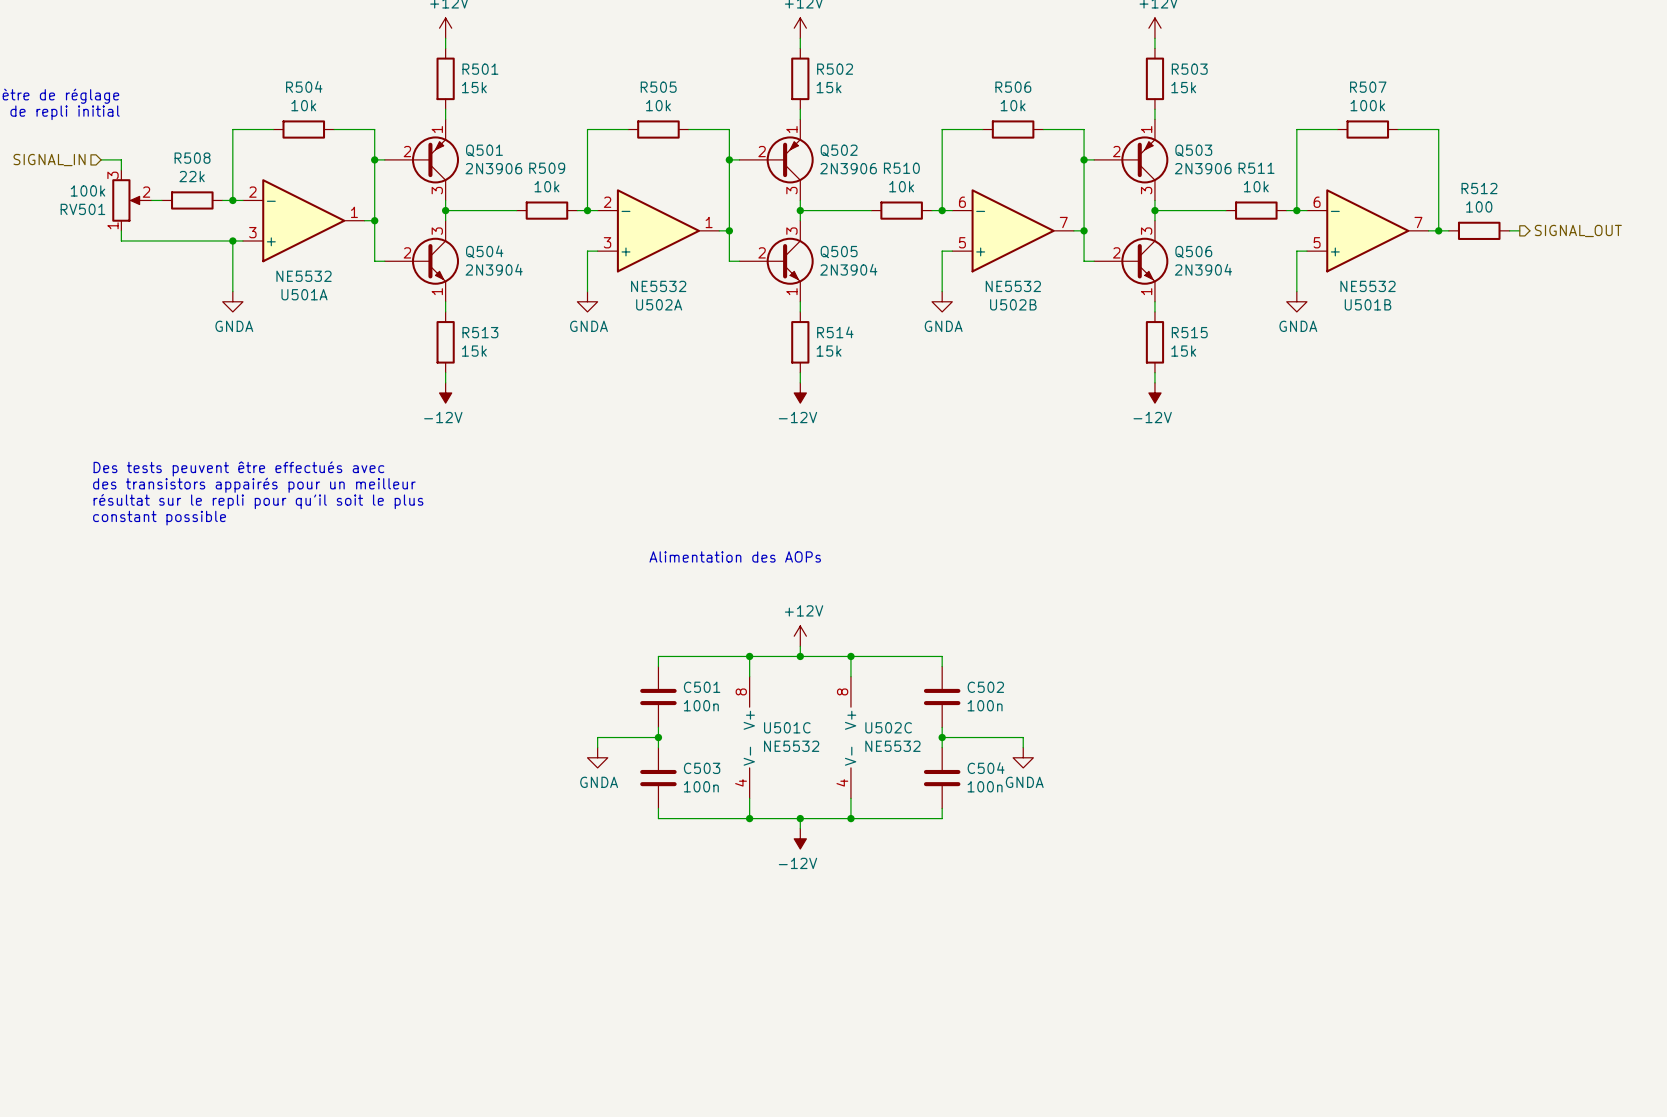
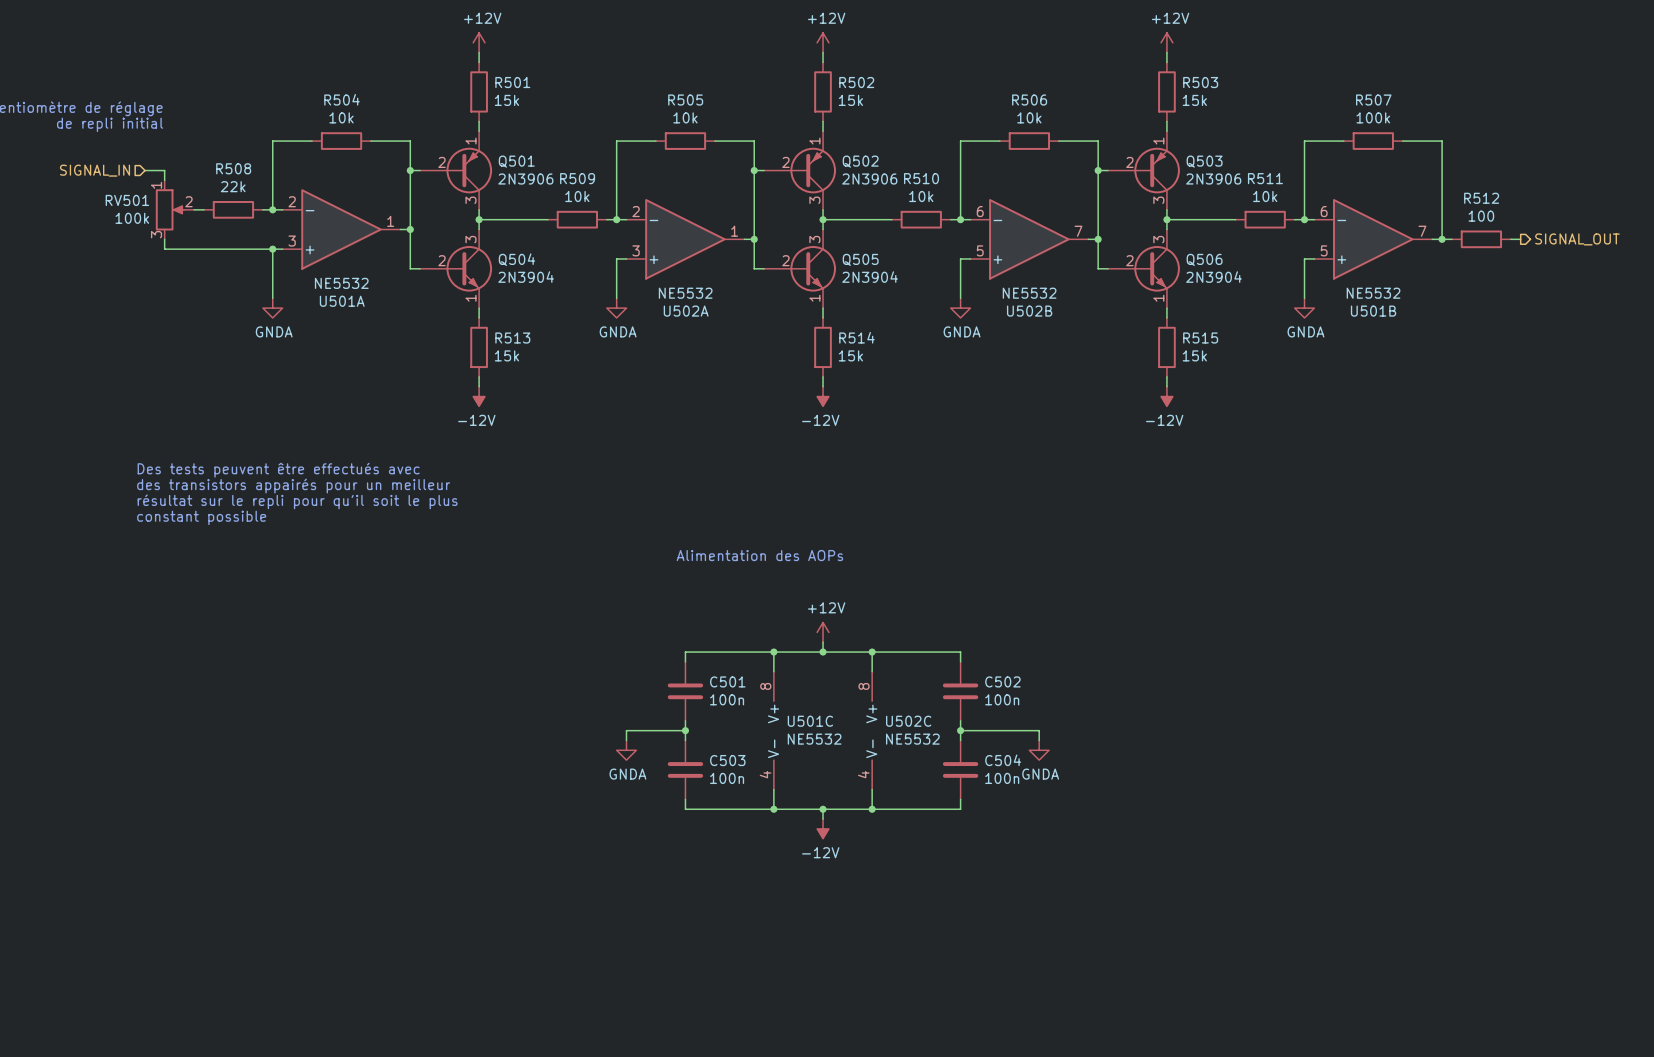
RV501 flip: as is (126, 200) -> up-down (170, 209)

